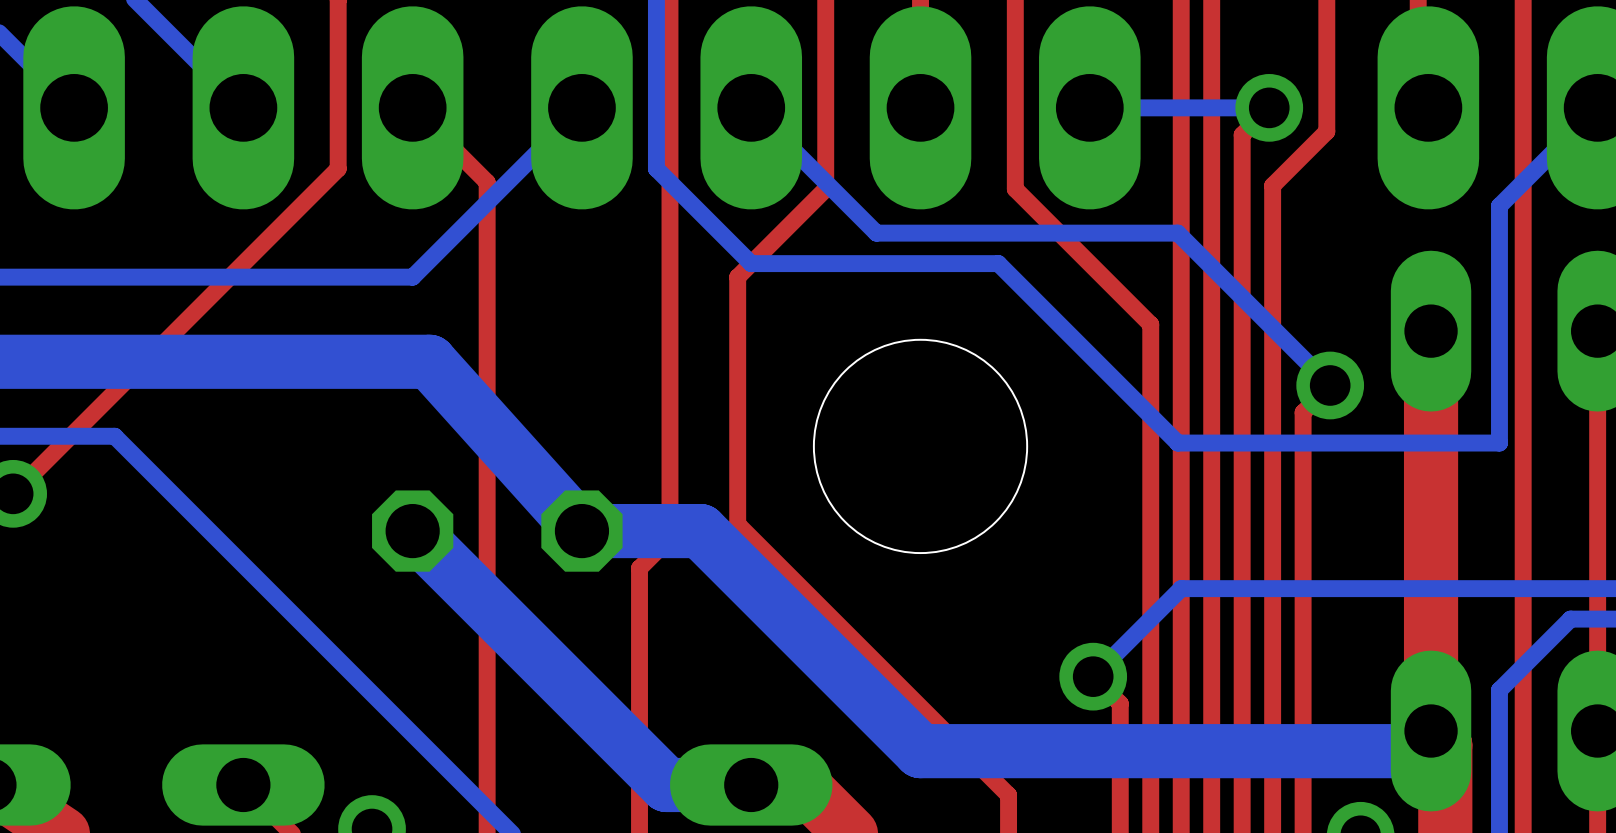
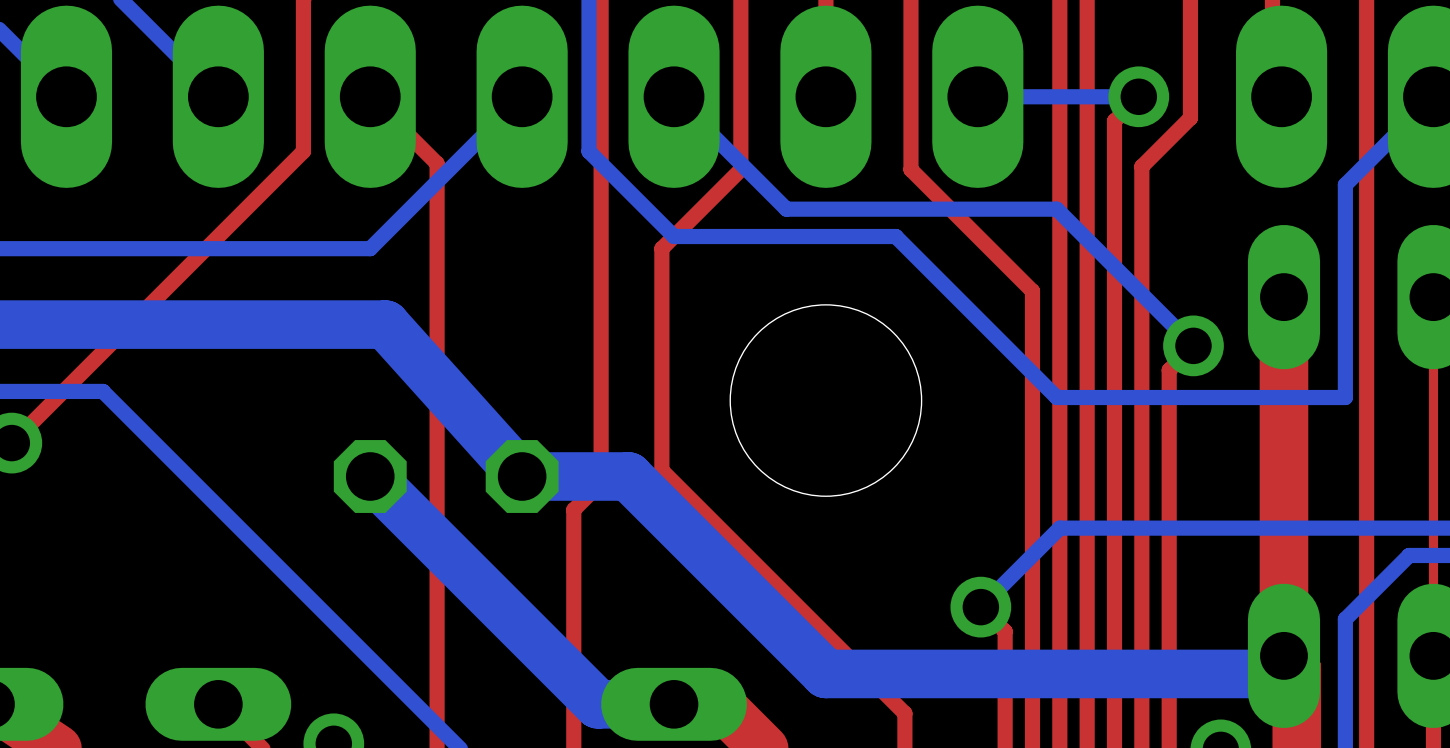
top track width: thick (1597, 331) (1597, 731) -> thin (1433, 297) (1433, 655)

